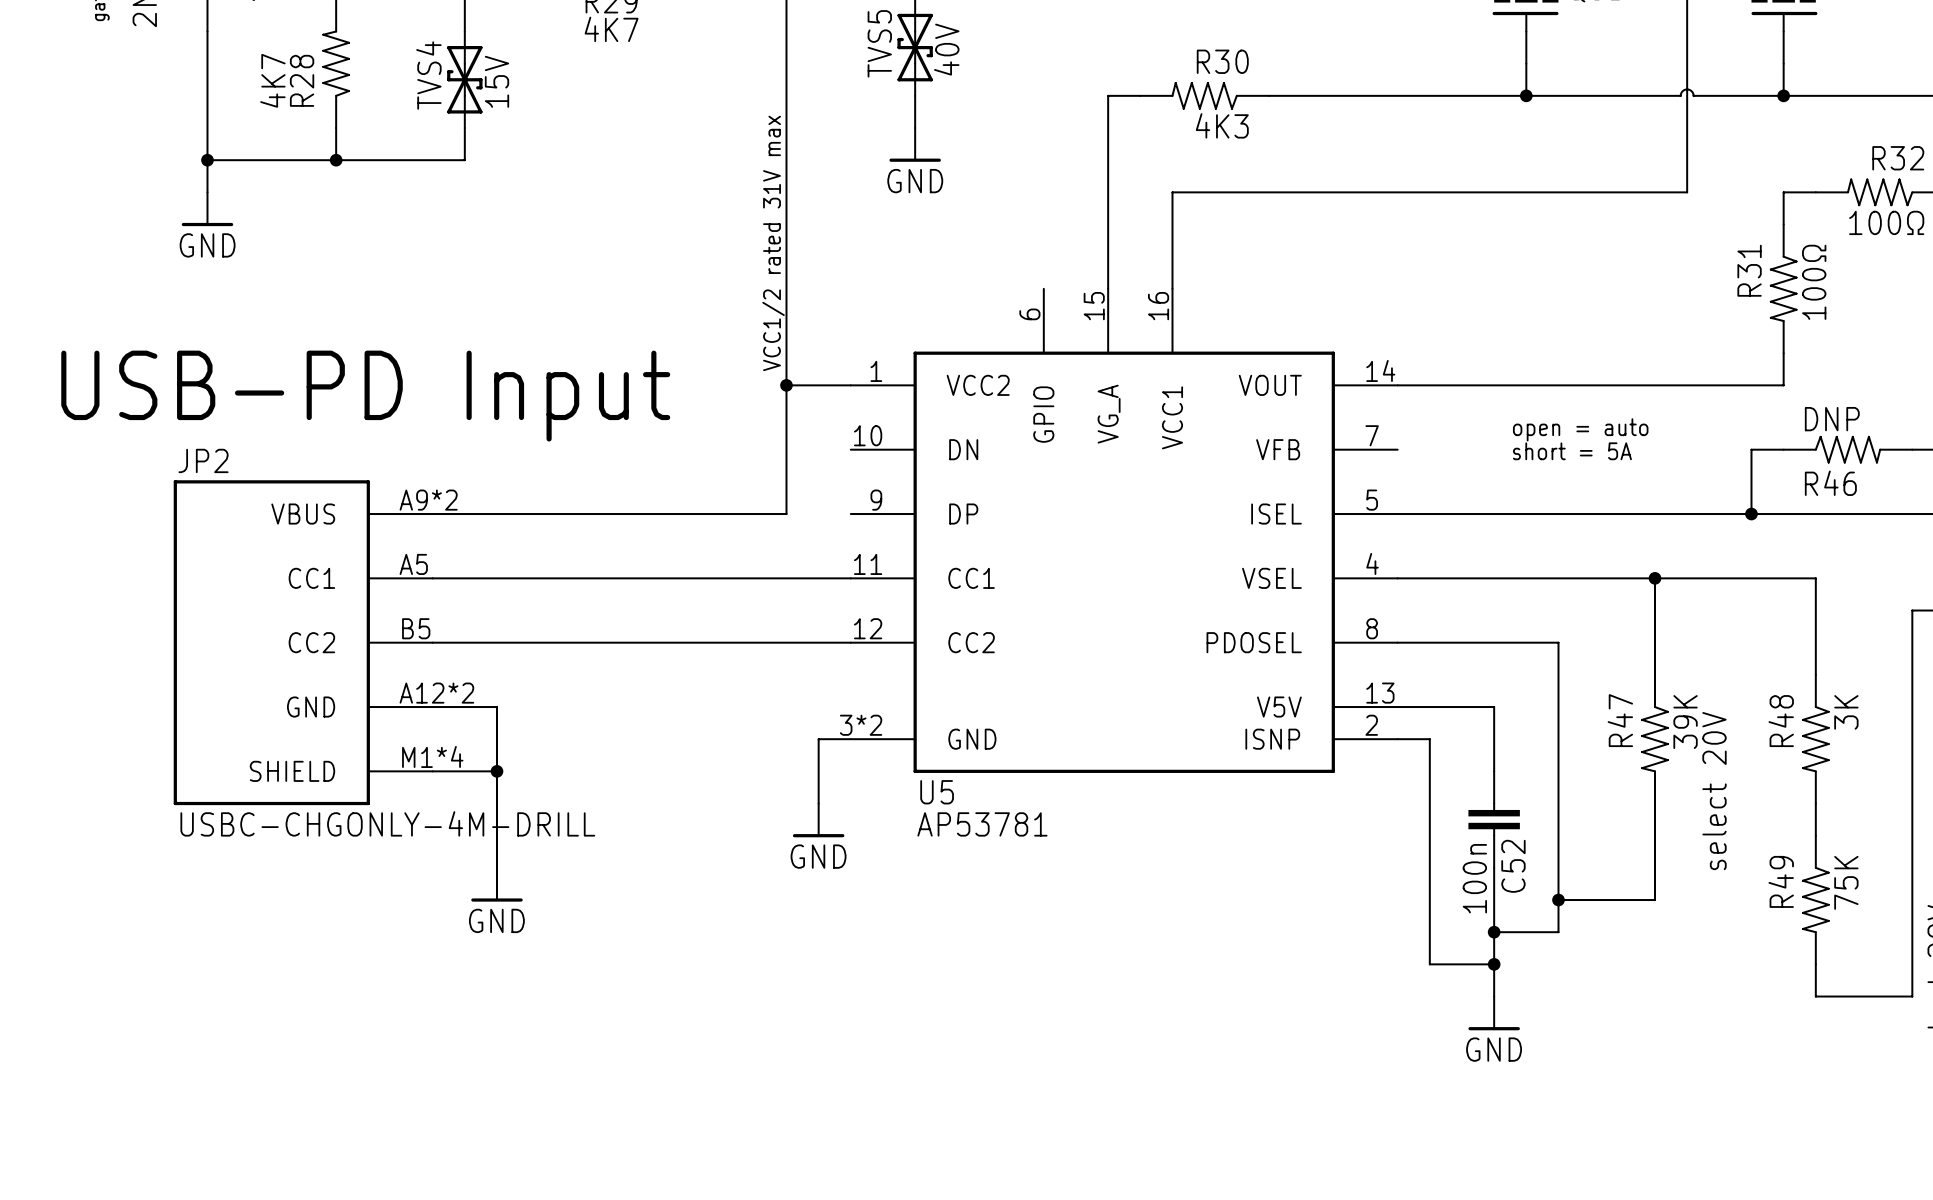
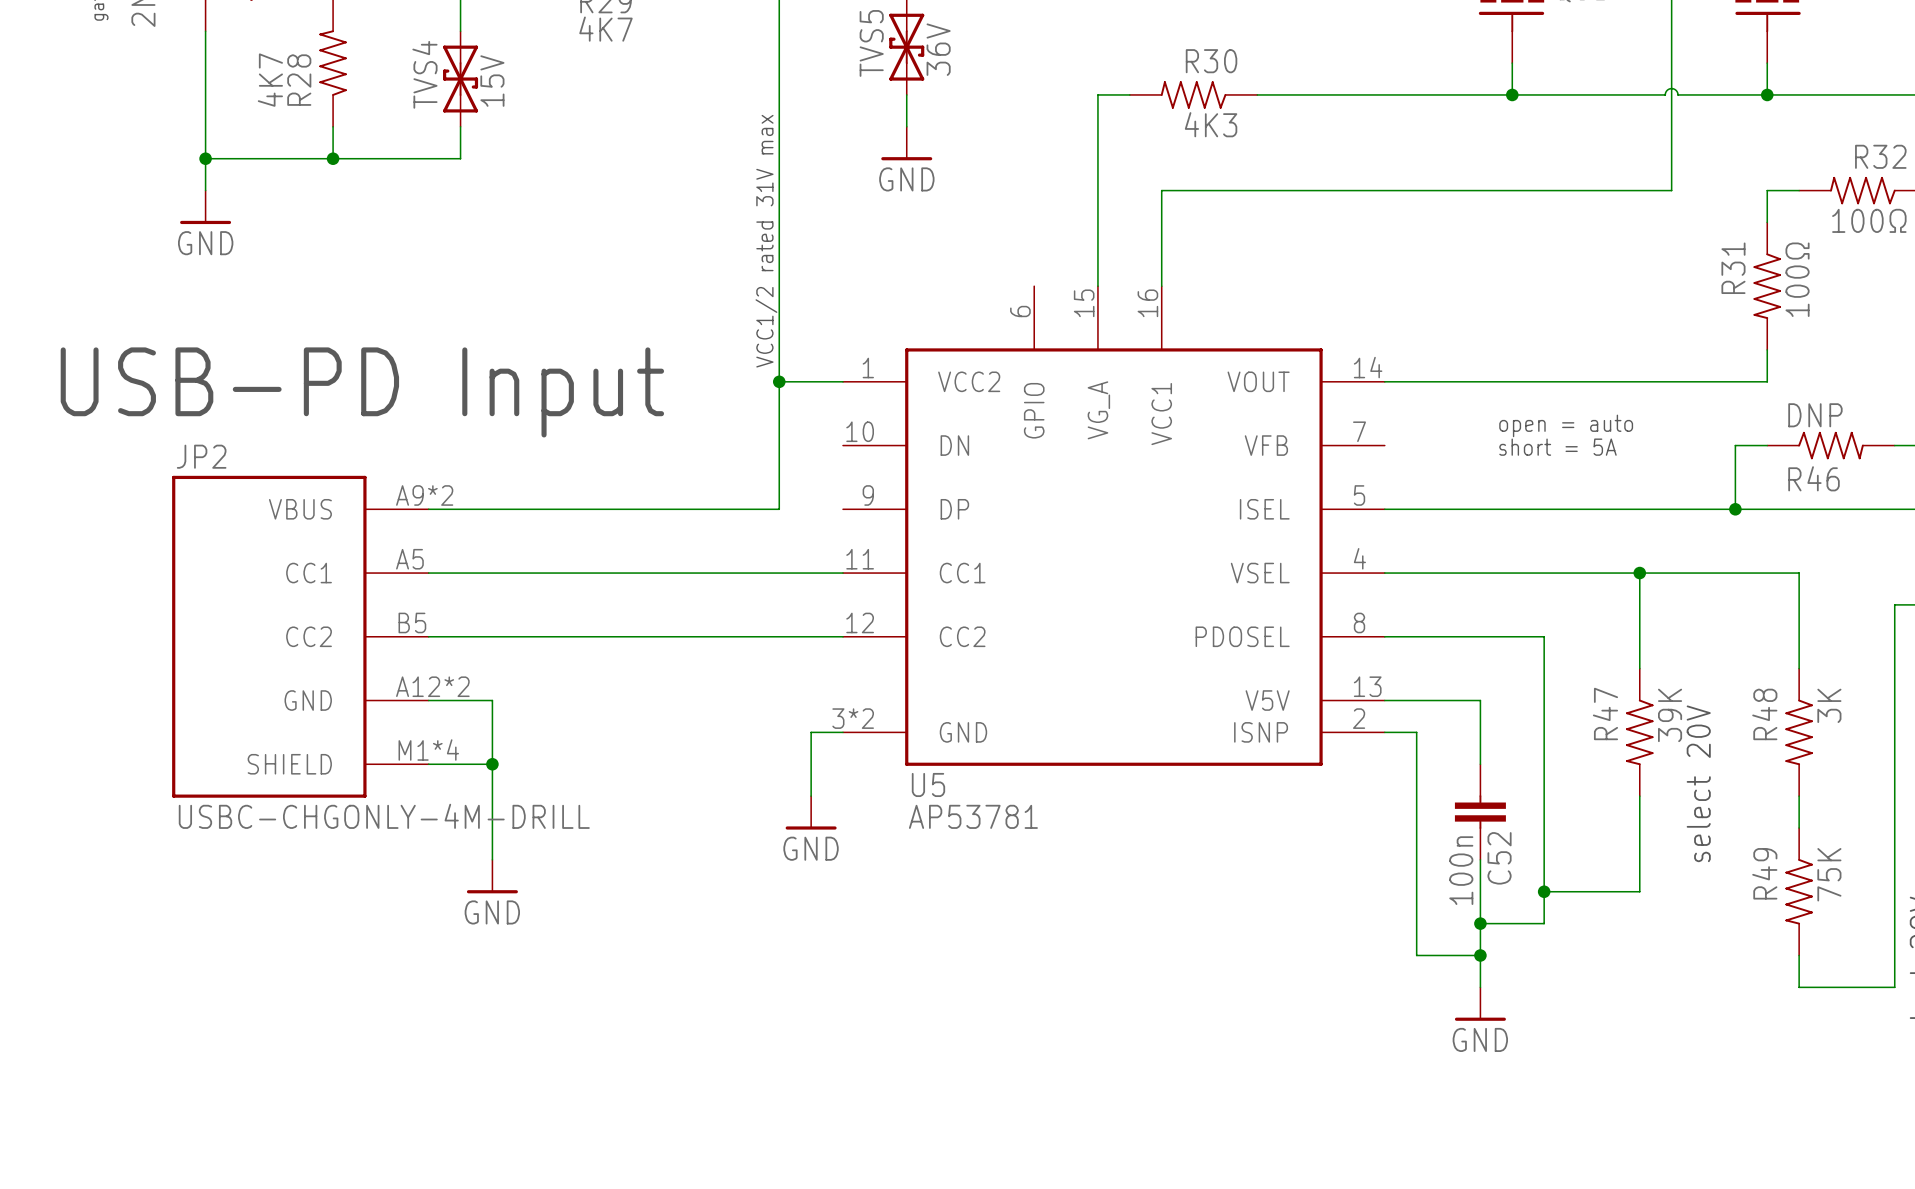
TVS5 value: 40V (946, 49) -> 36V (938, 49)

